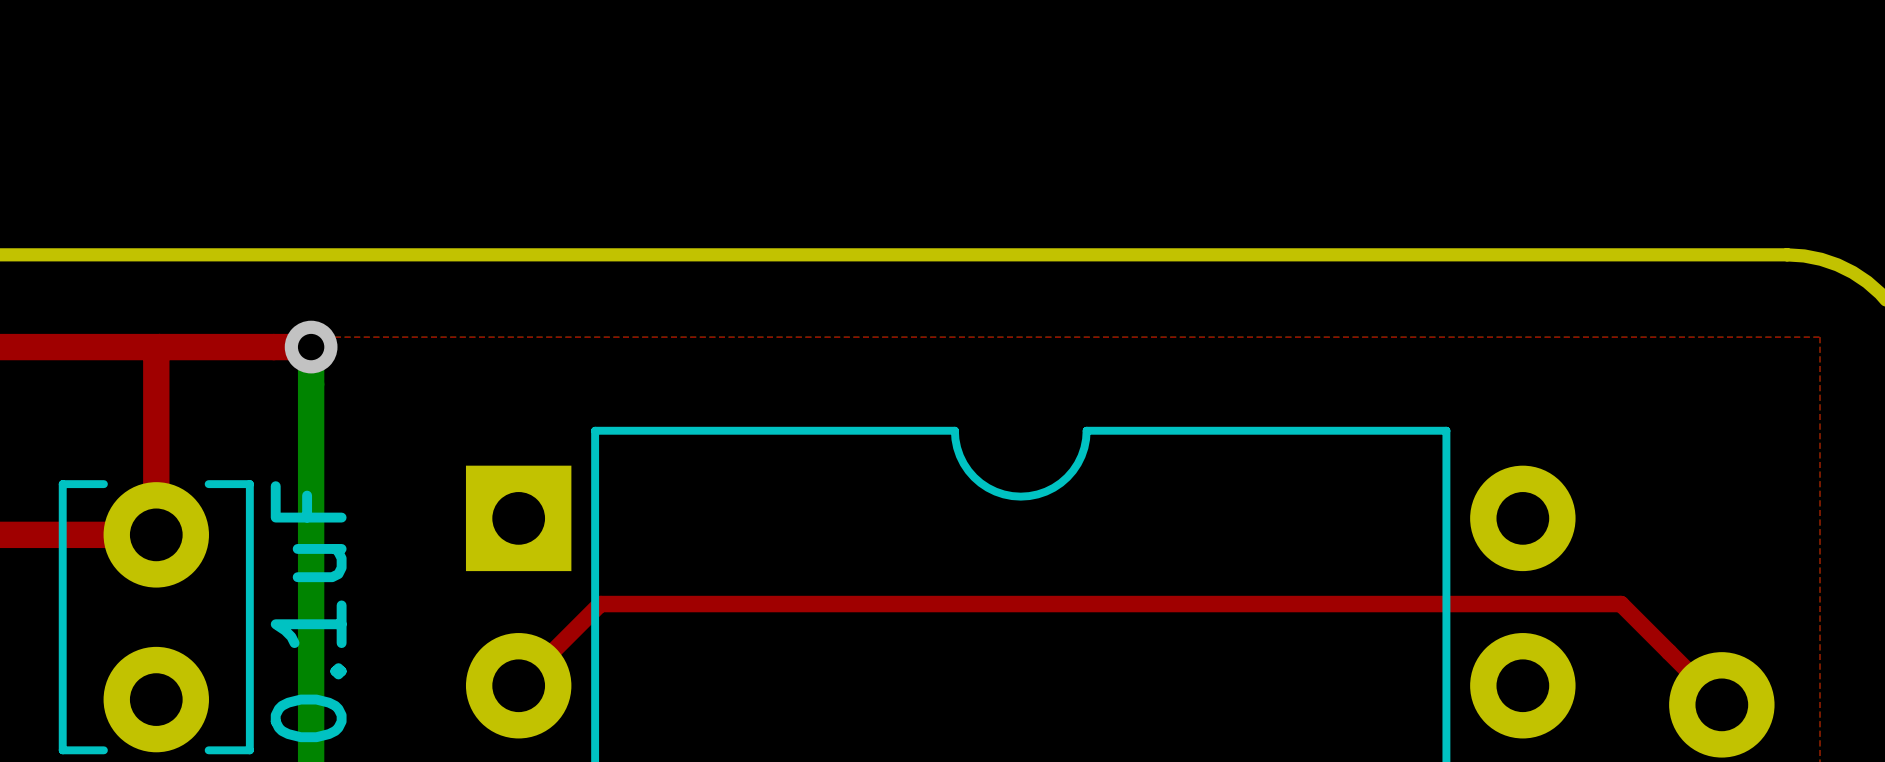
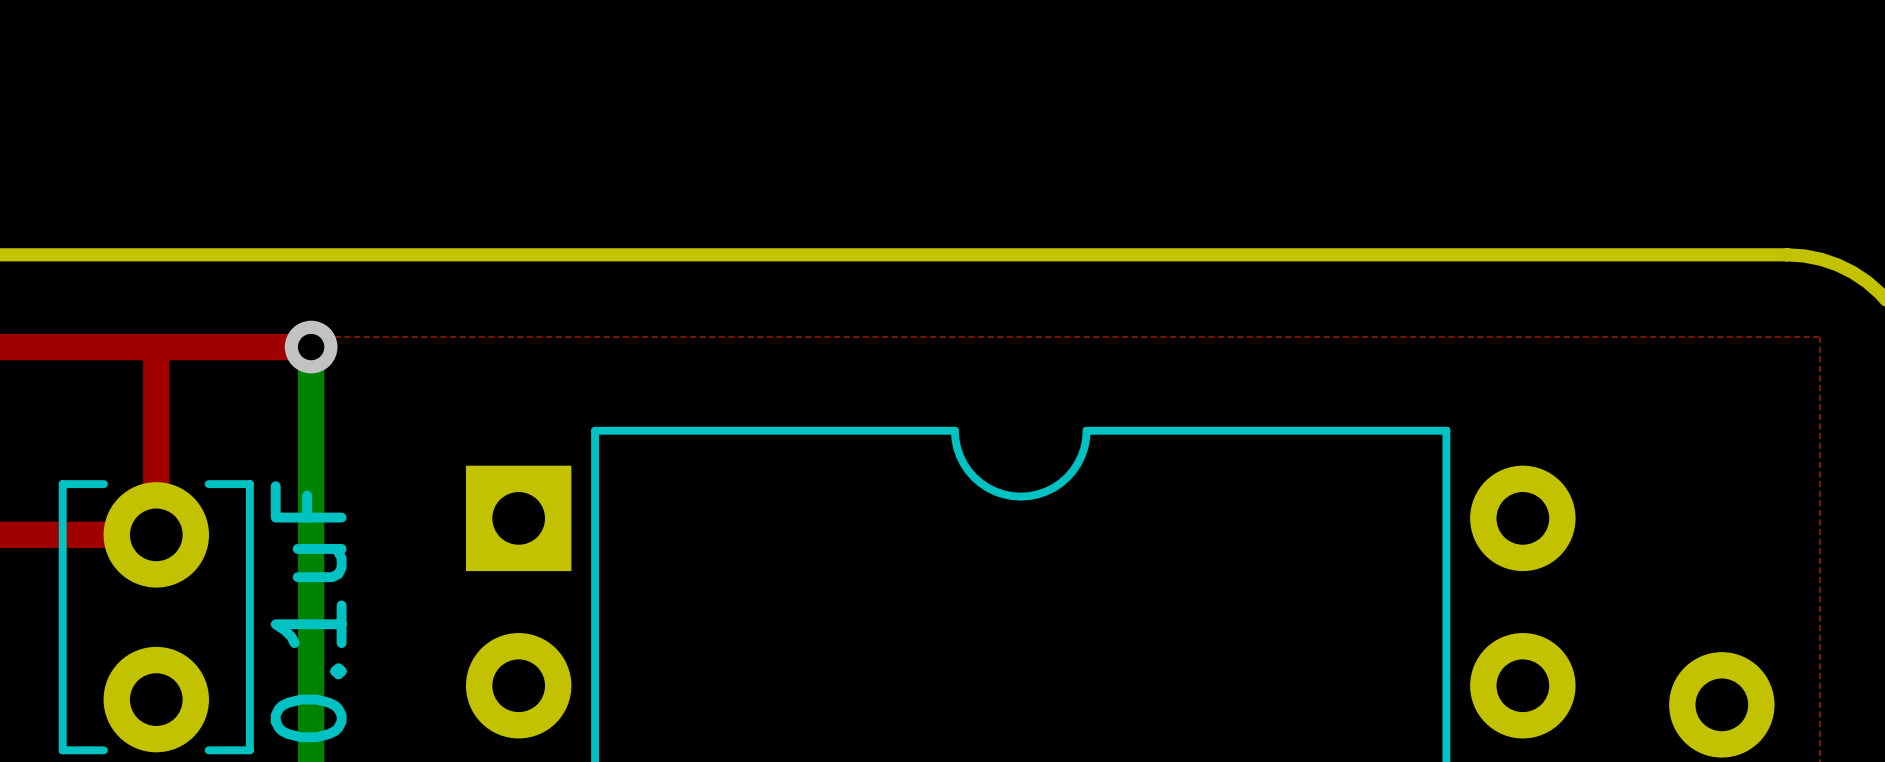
top track: (518, 685) (600, 604) (1621, 604) (1721, 704) -> none

